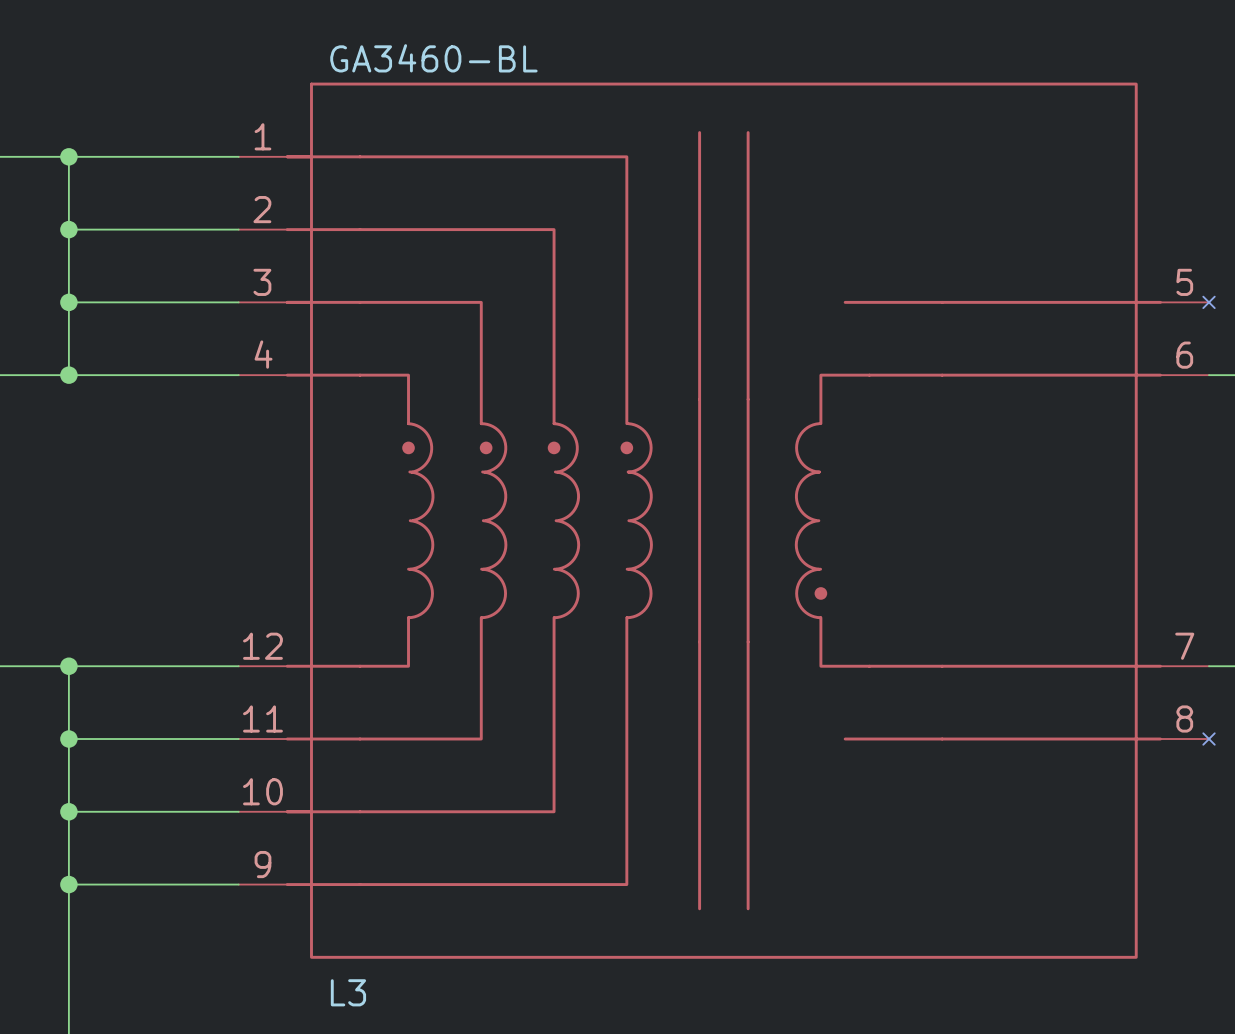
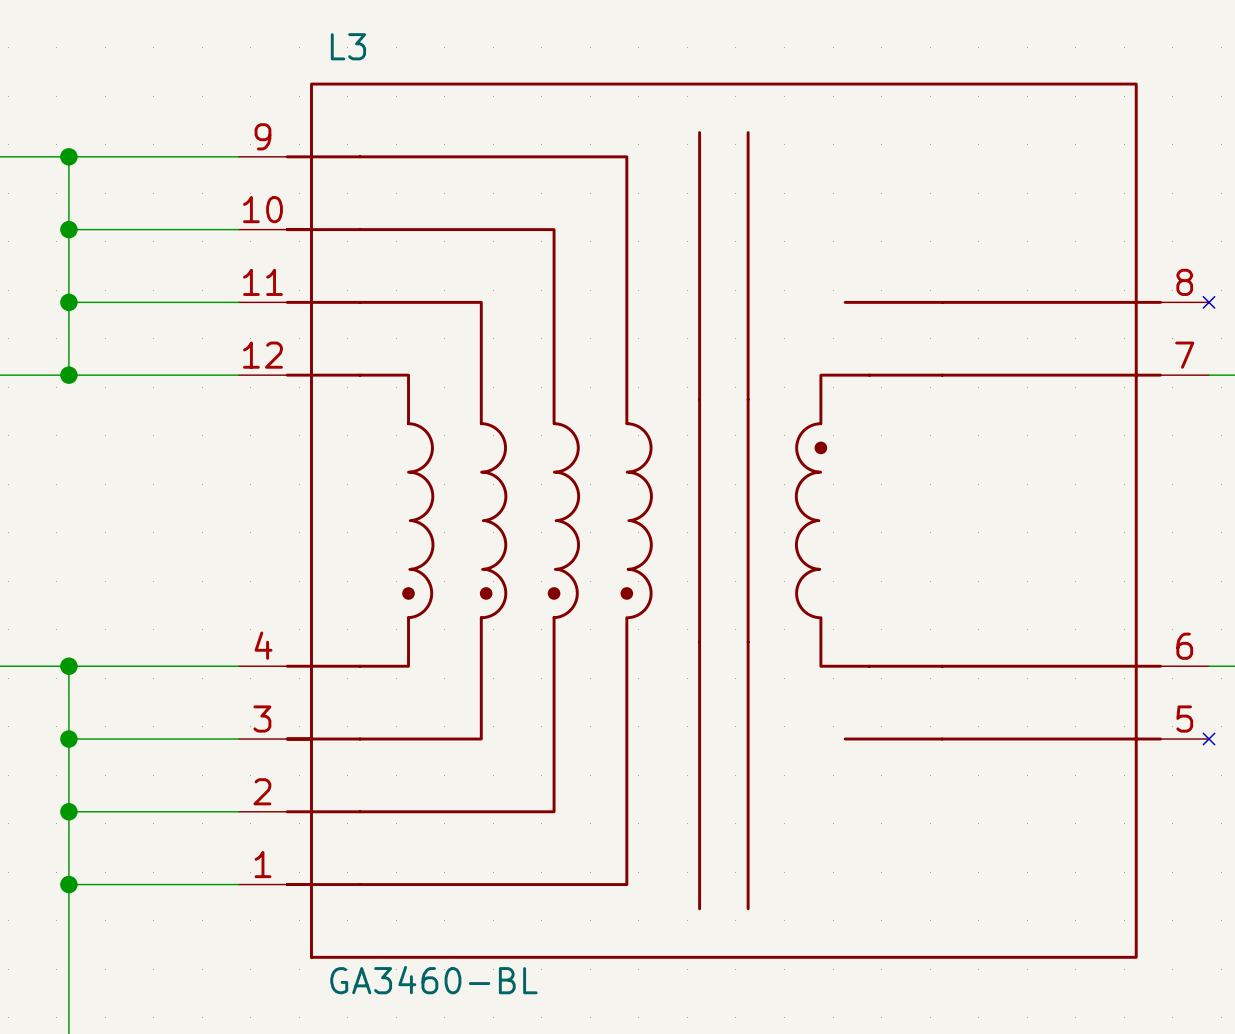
L3 flip: as is (750, 520) -> up-down (750, 520)

